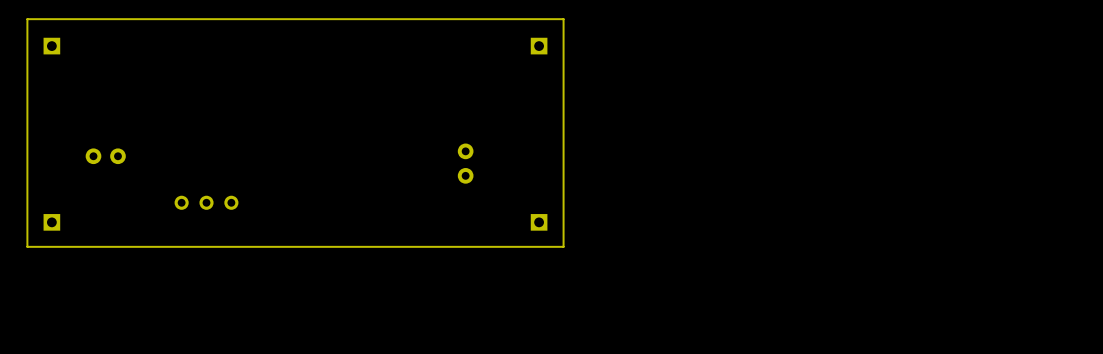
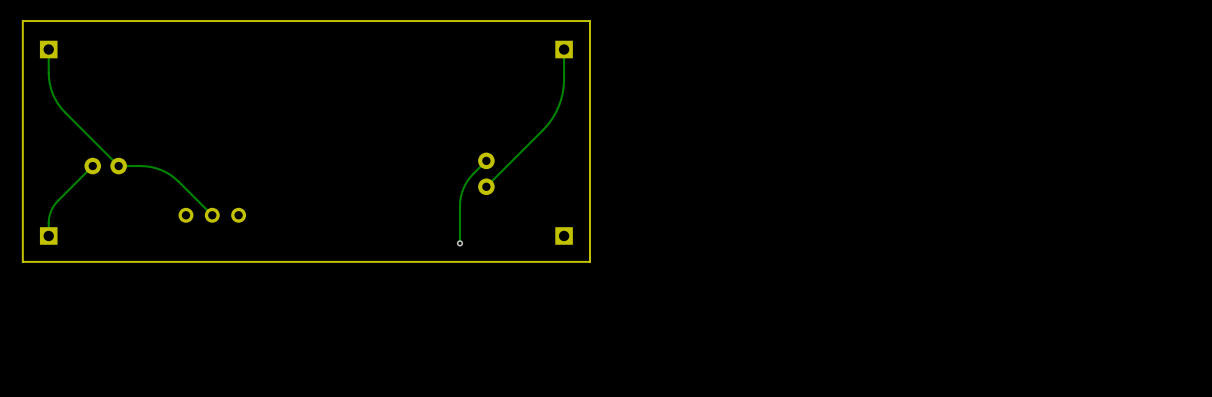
track: none -> (48, 49) (51, 89) (55, 99) (65, 112) (118, 166) (146, 166) (166, 172) (178, 181) (212, 215)
track: none -> (564, 49) (563, 86) (555, 113) (543, 130) (486, 186)
track: none -> (486, 160) (470, 177) (461, 192) (459, 243)
track: none -> (92, 166) (54, 205) (49, 216) (48, 235)
via: none -> (459, 243)

